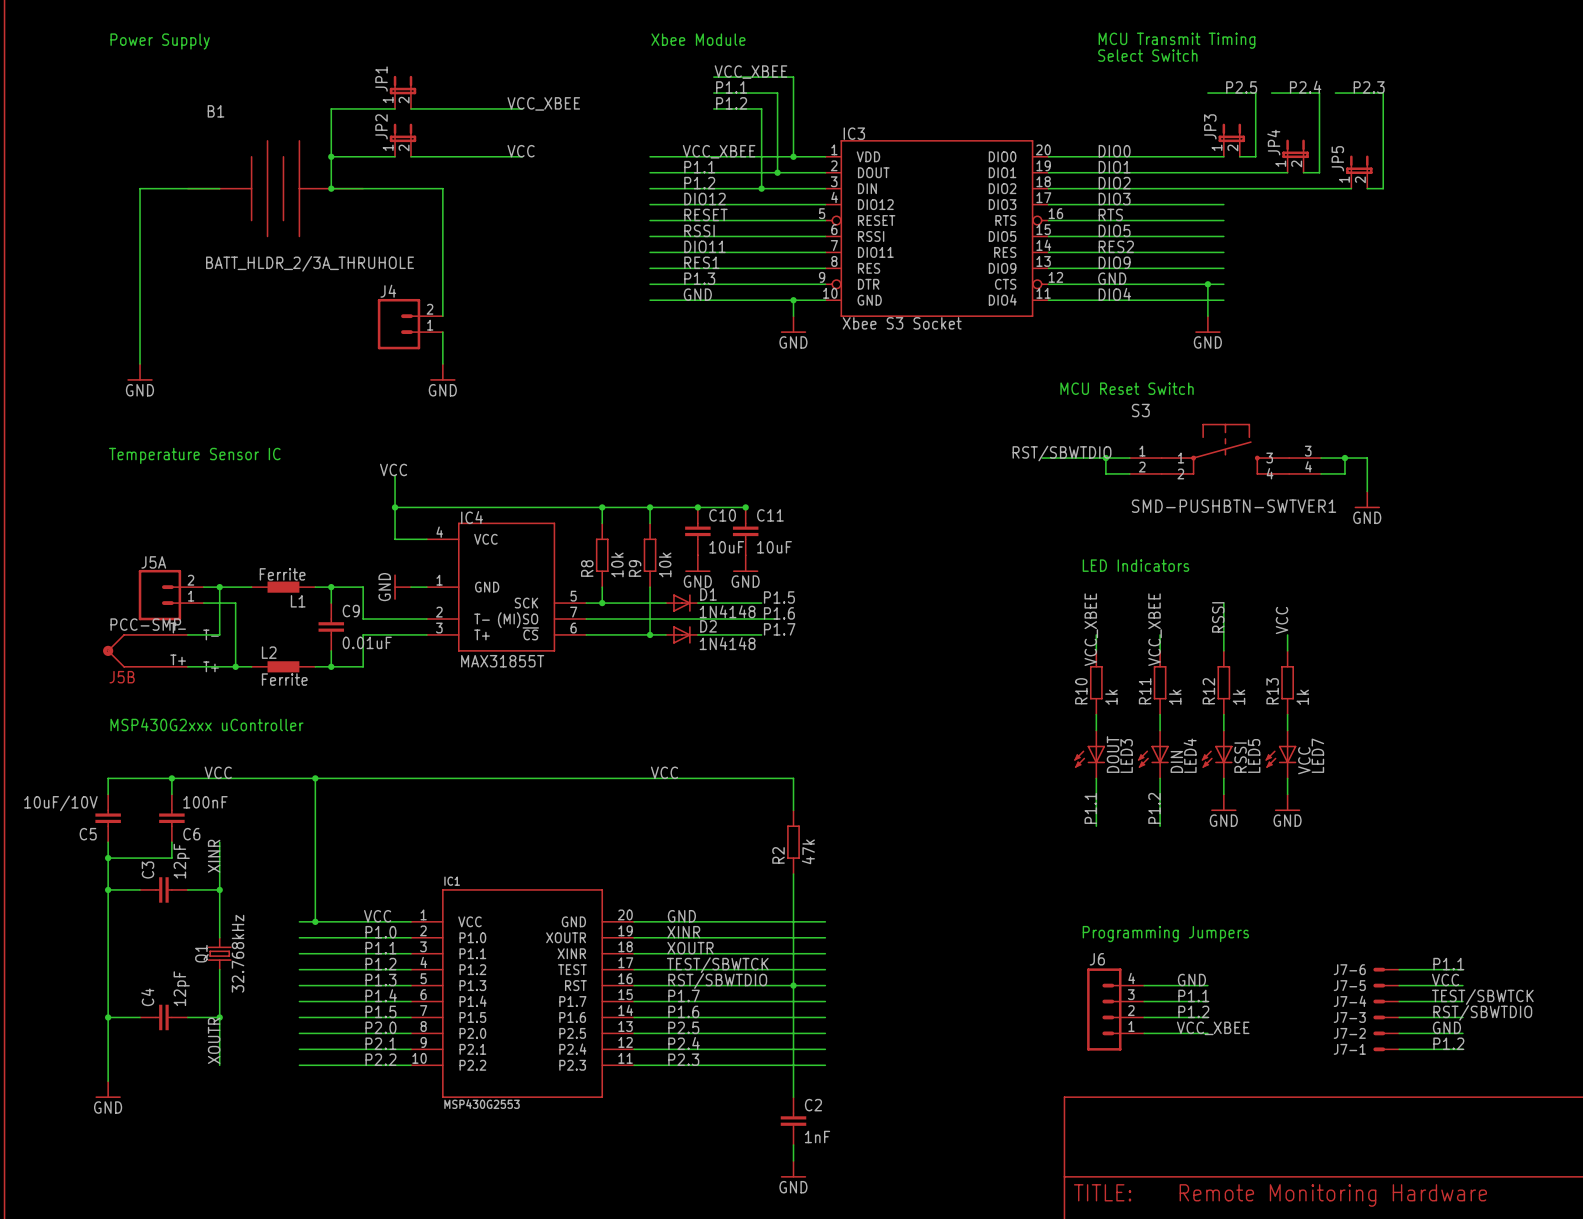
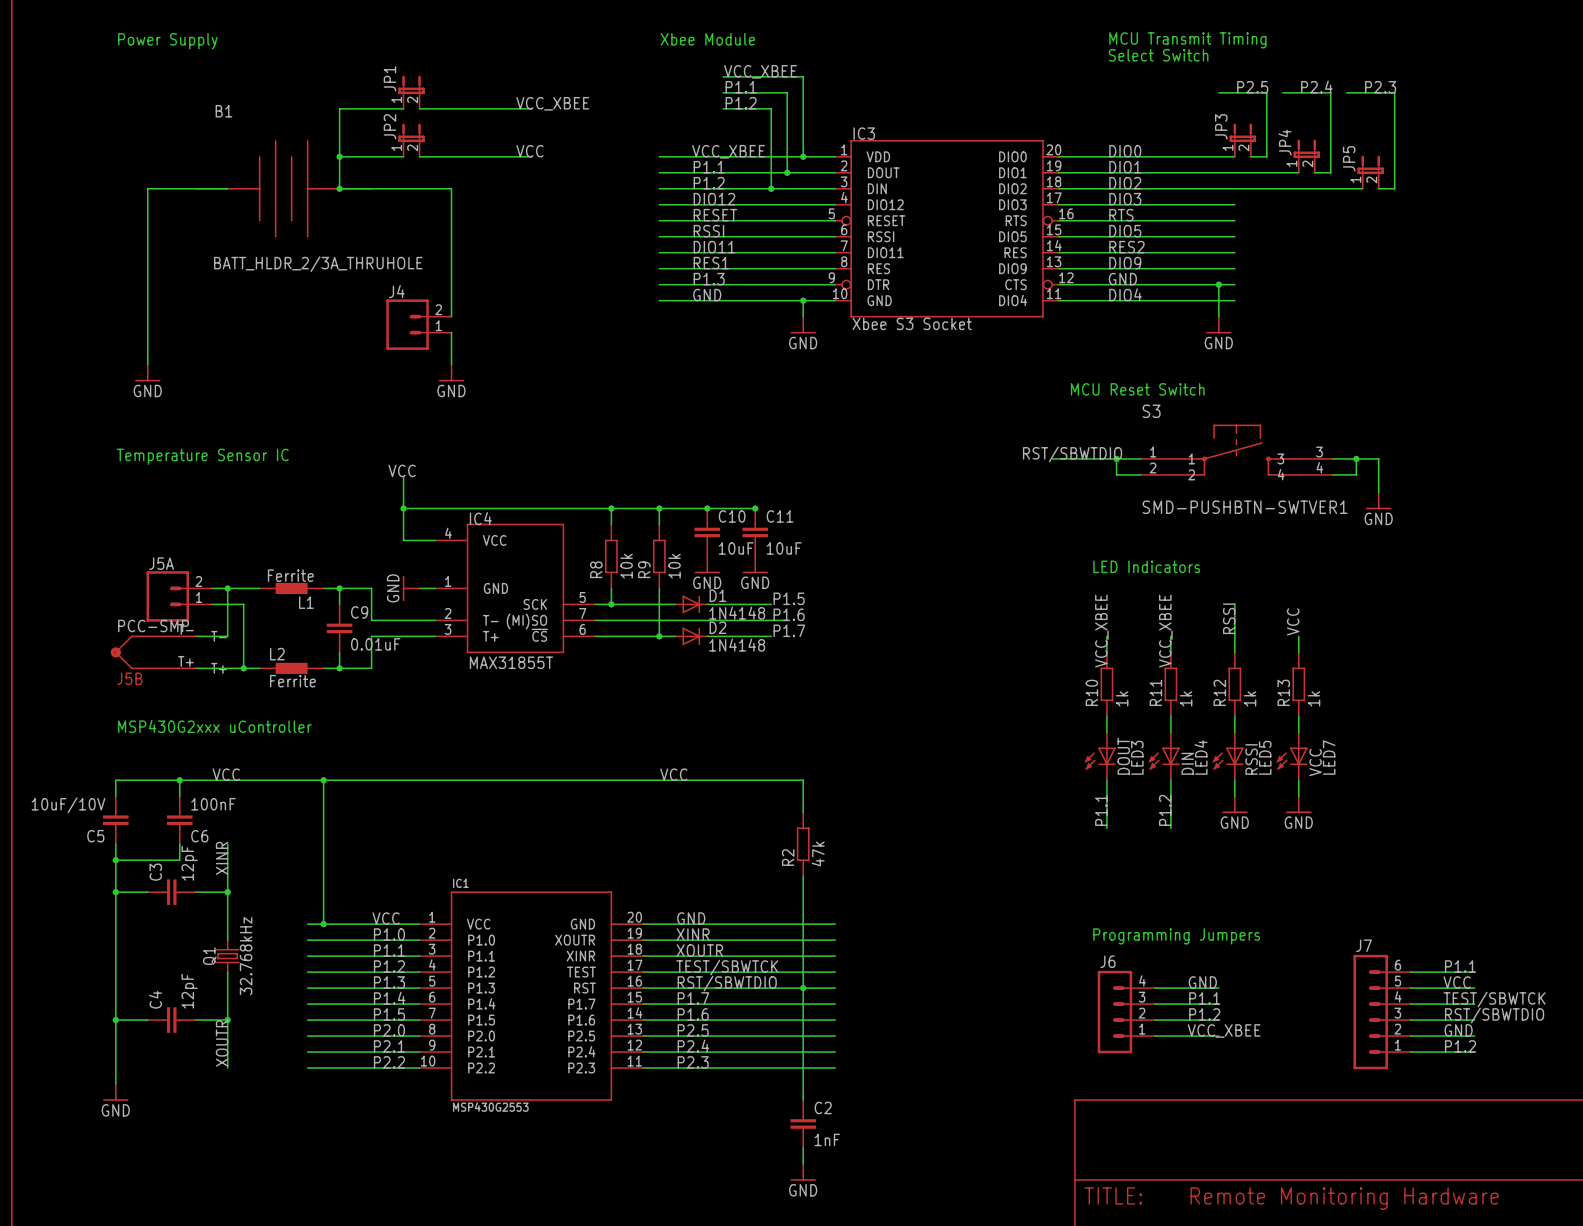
J7-6: (1386, 969) -> none
J7-5: (1386, 985) -> none
J7-4: (1386, 1001) -> none
J7: none -> (1382, 1012)
J7-3: (1386, 1017) -> none
J7-2: (1386, 1033) -> none
J7-1: (1386, 1049) -> none

